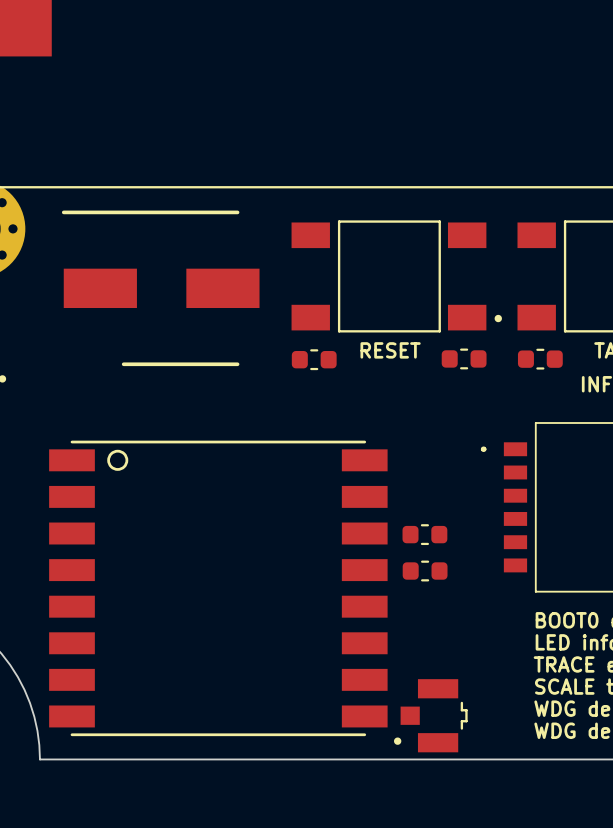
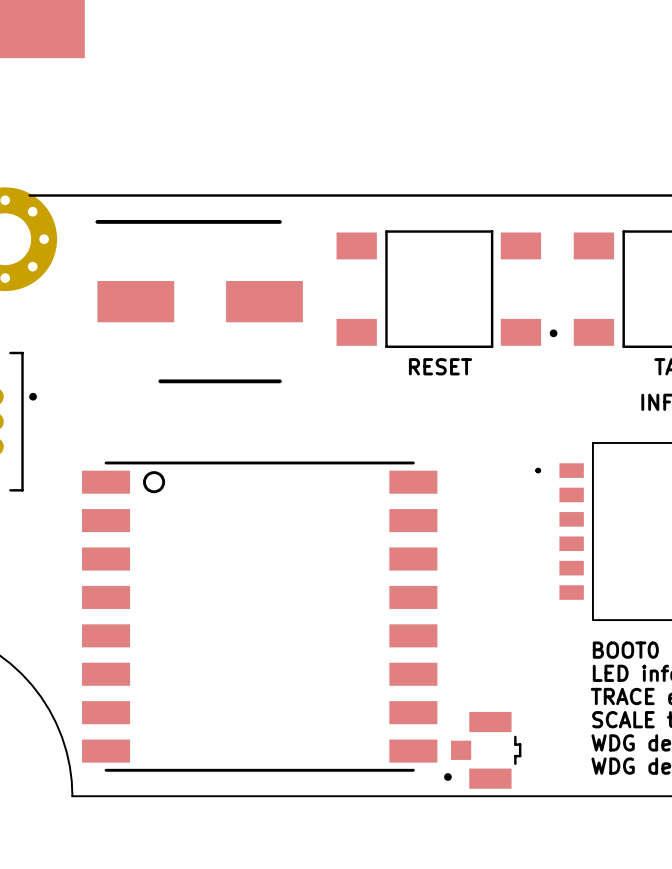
part: (464, 358) -> none
part: (314, 359) -> none
part: (540, 359) -> none
part: (424, 534) -> none
part: (425, 571) -> none

